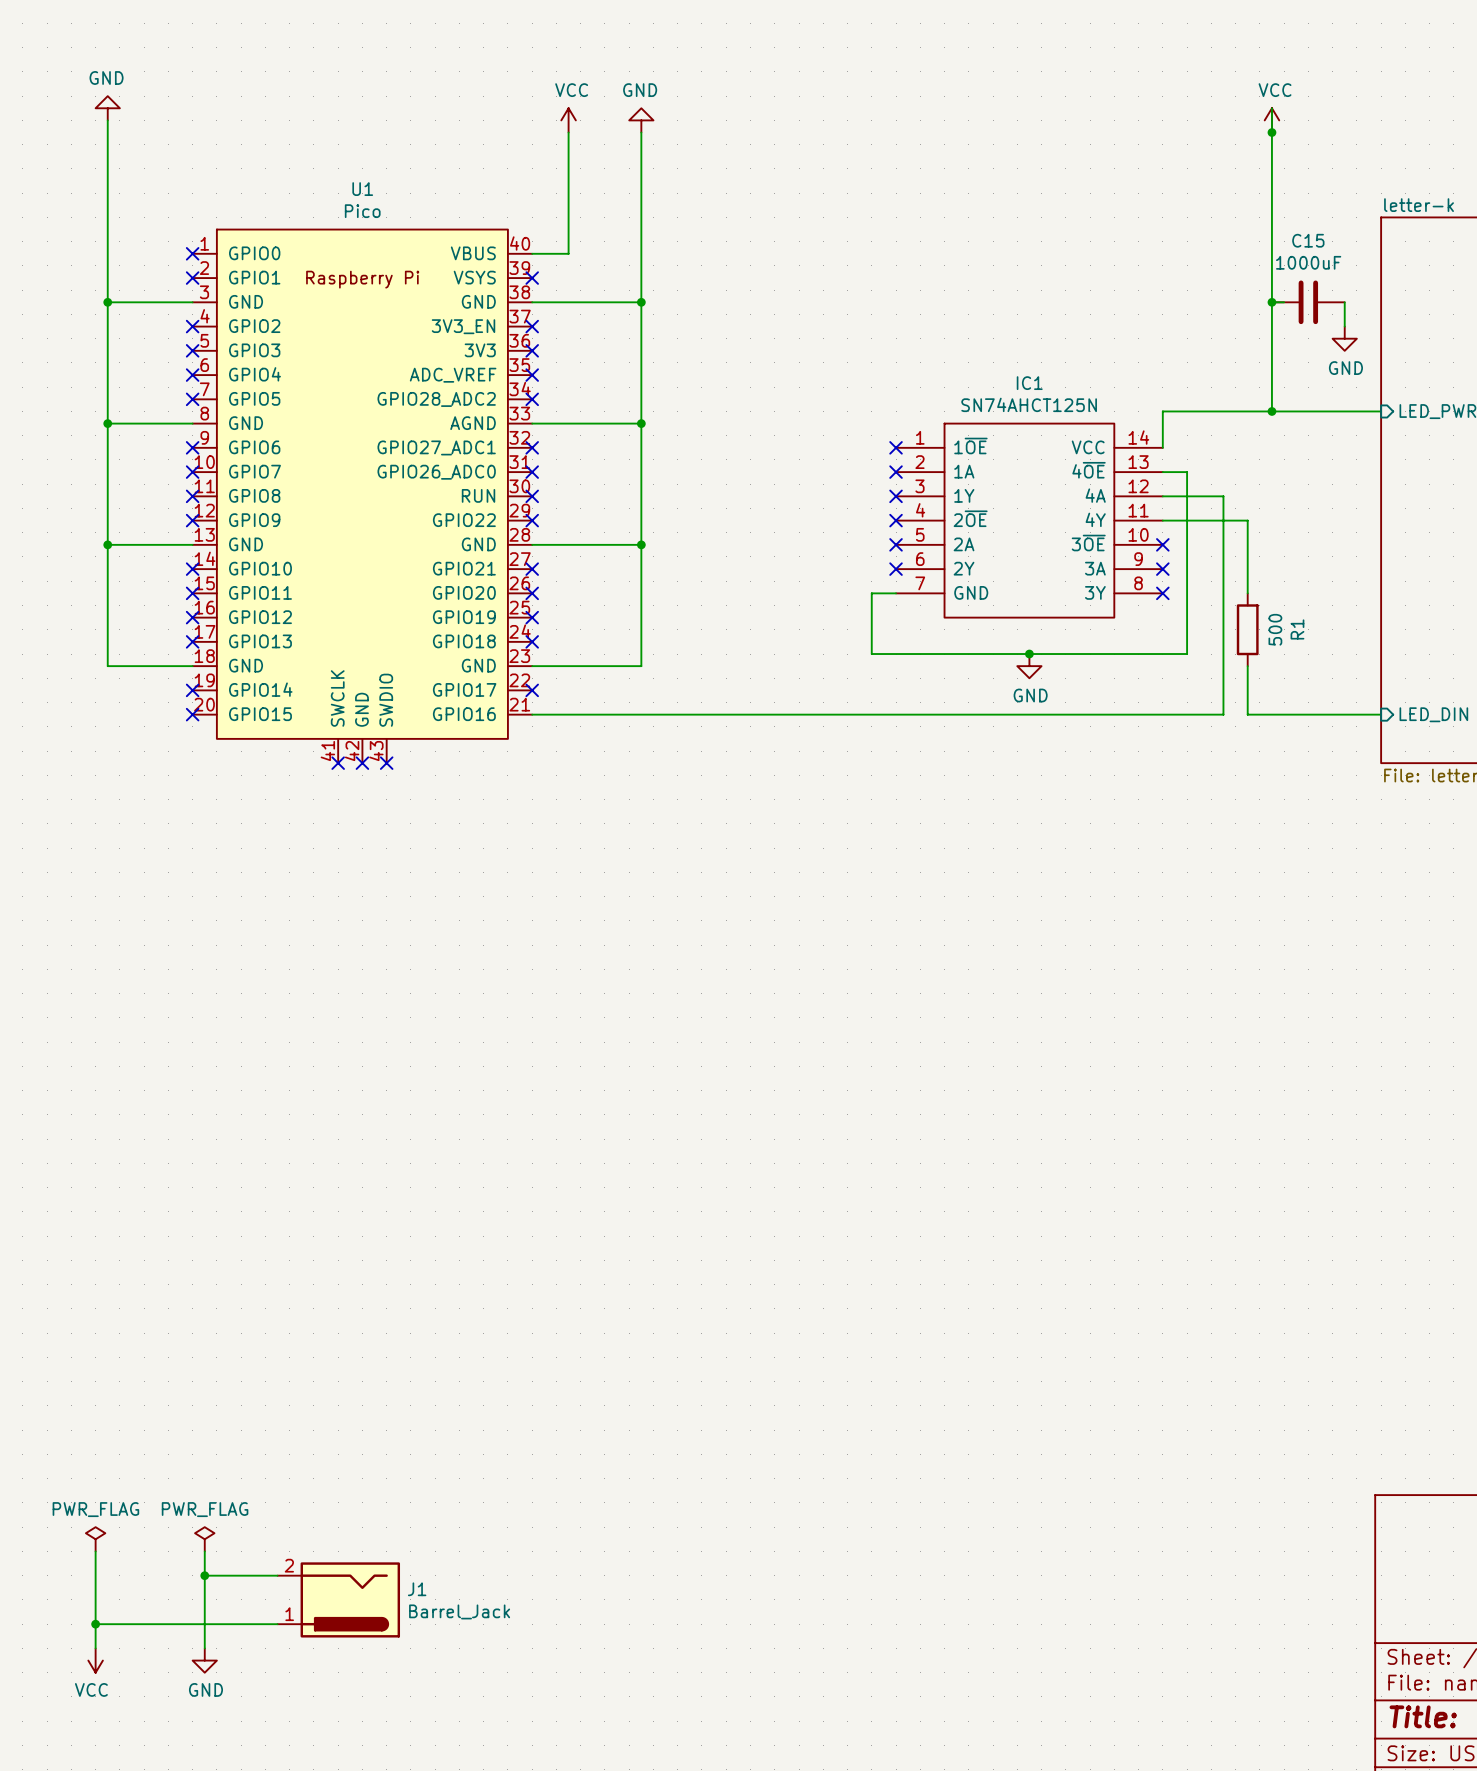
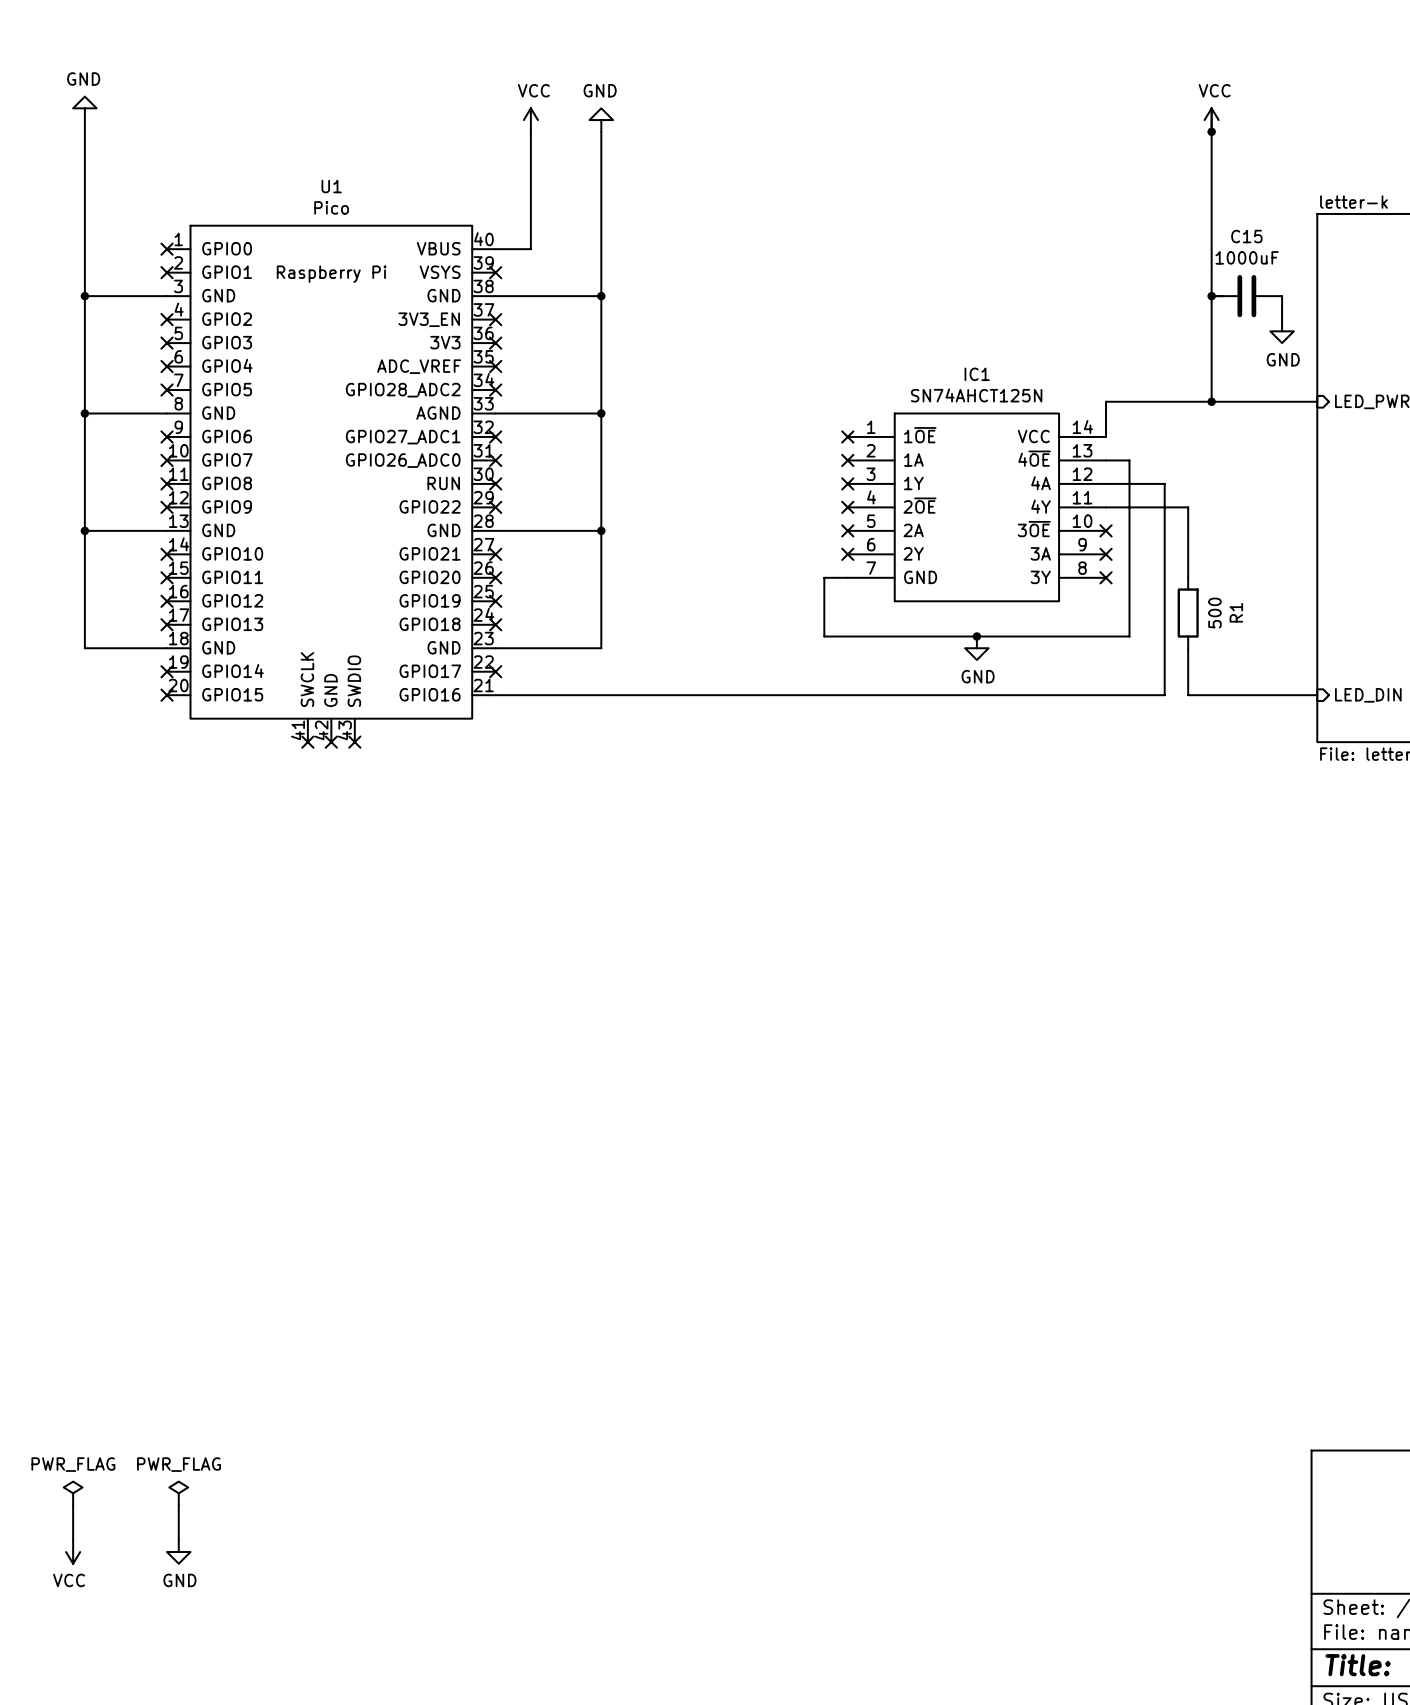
wire: (204, 1575) (277, 1575) -> none
junction: (204, 1575) -> none
wire: (95, 1587) (95, 1648) -> none
wire: (204, 1587) (204, 1648) -> none
J1: Barrel_Jack (338, 1599) -> none
wire: (95, 1624) (277, 1624) -> none
junction: (95, 1624) -> none
power symbol position: VCC (95, 1660) -> VCC (73, 1552)
power symbol position: GND (204, 1660) -> GND (178, 1552)

